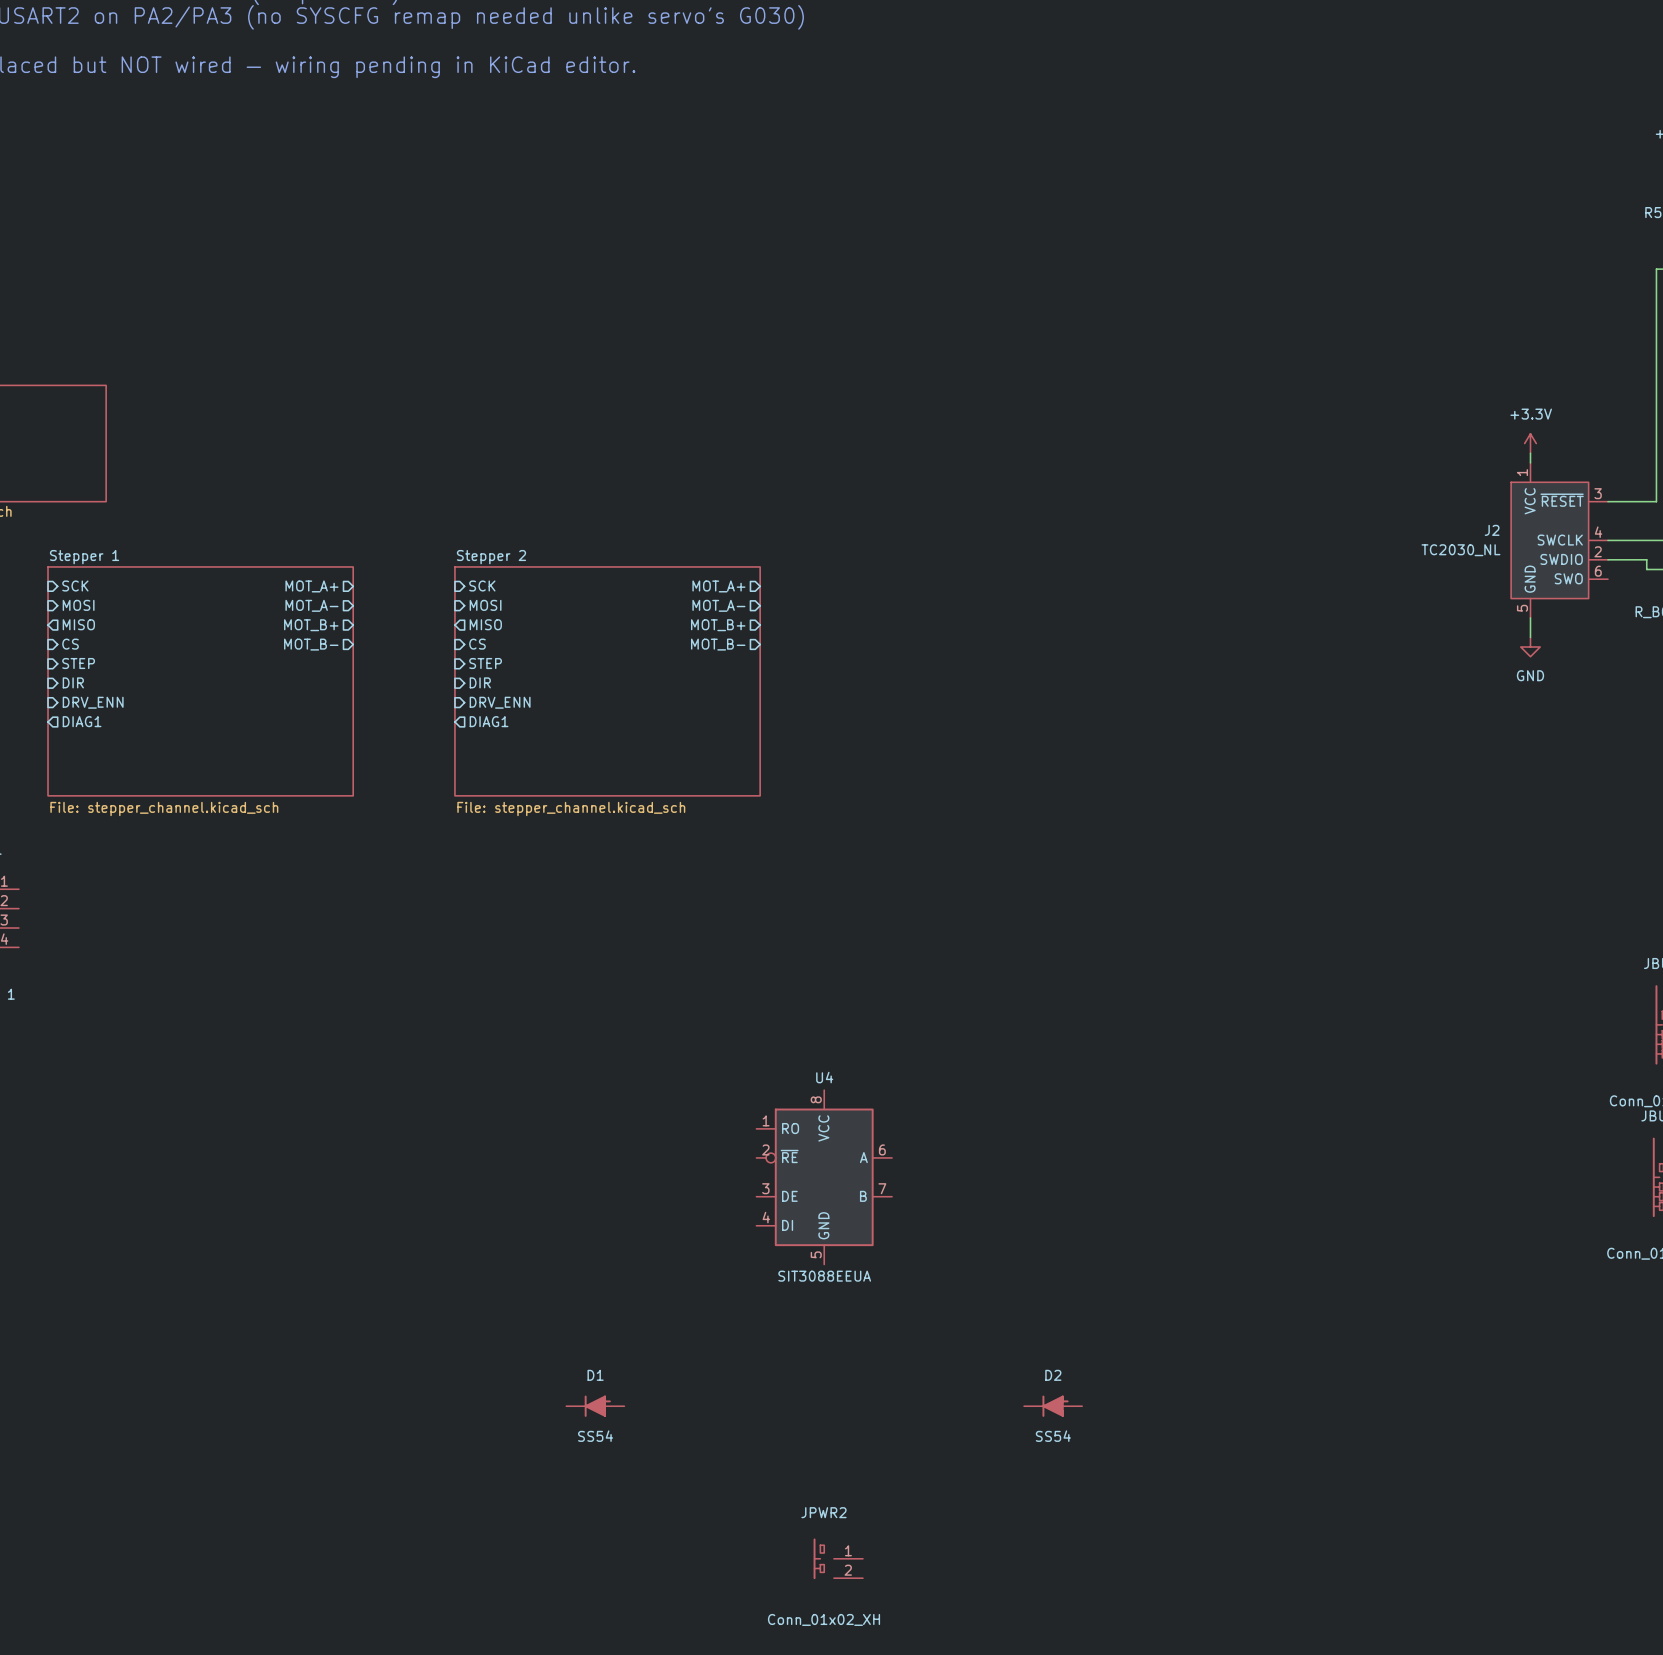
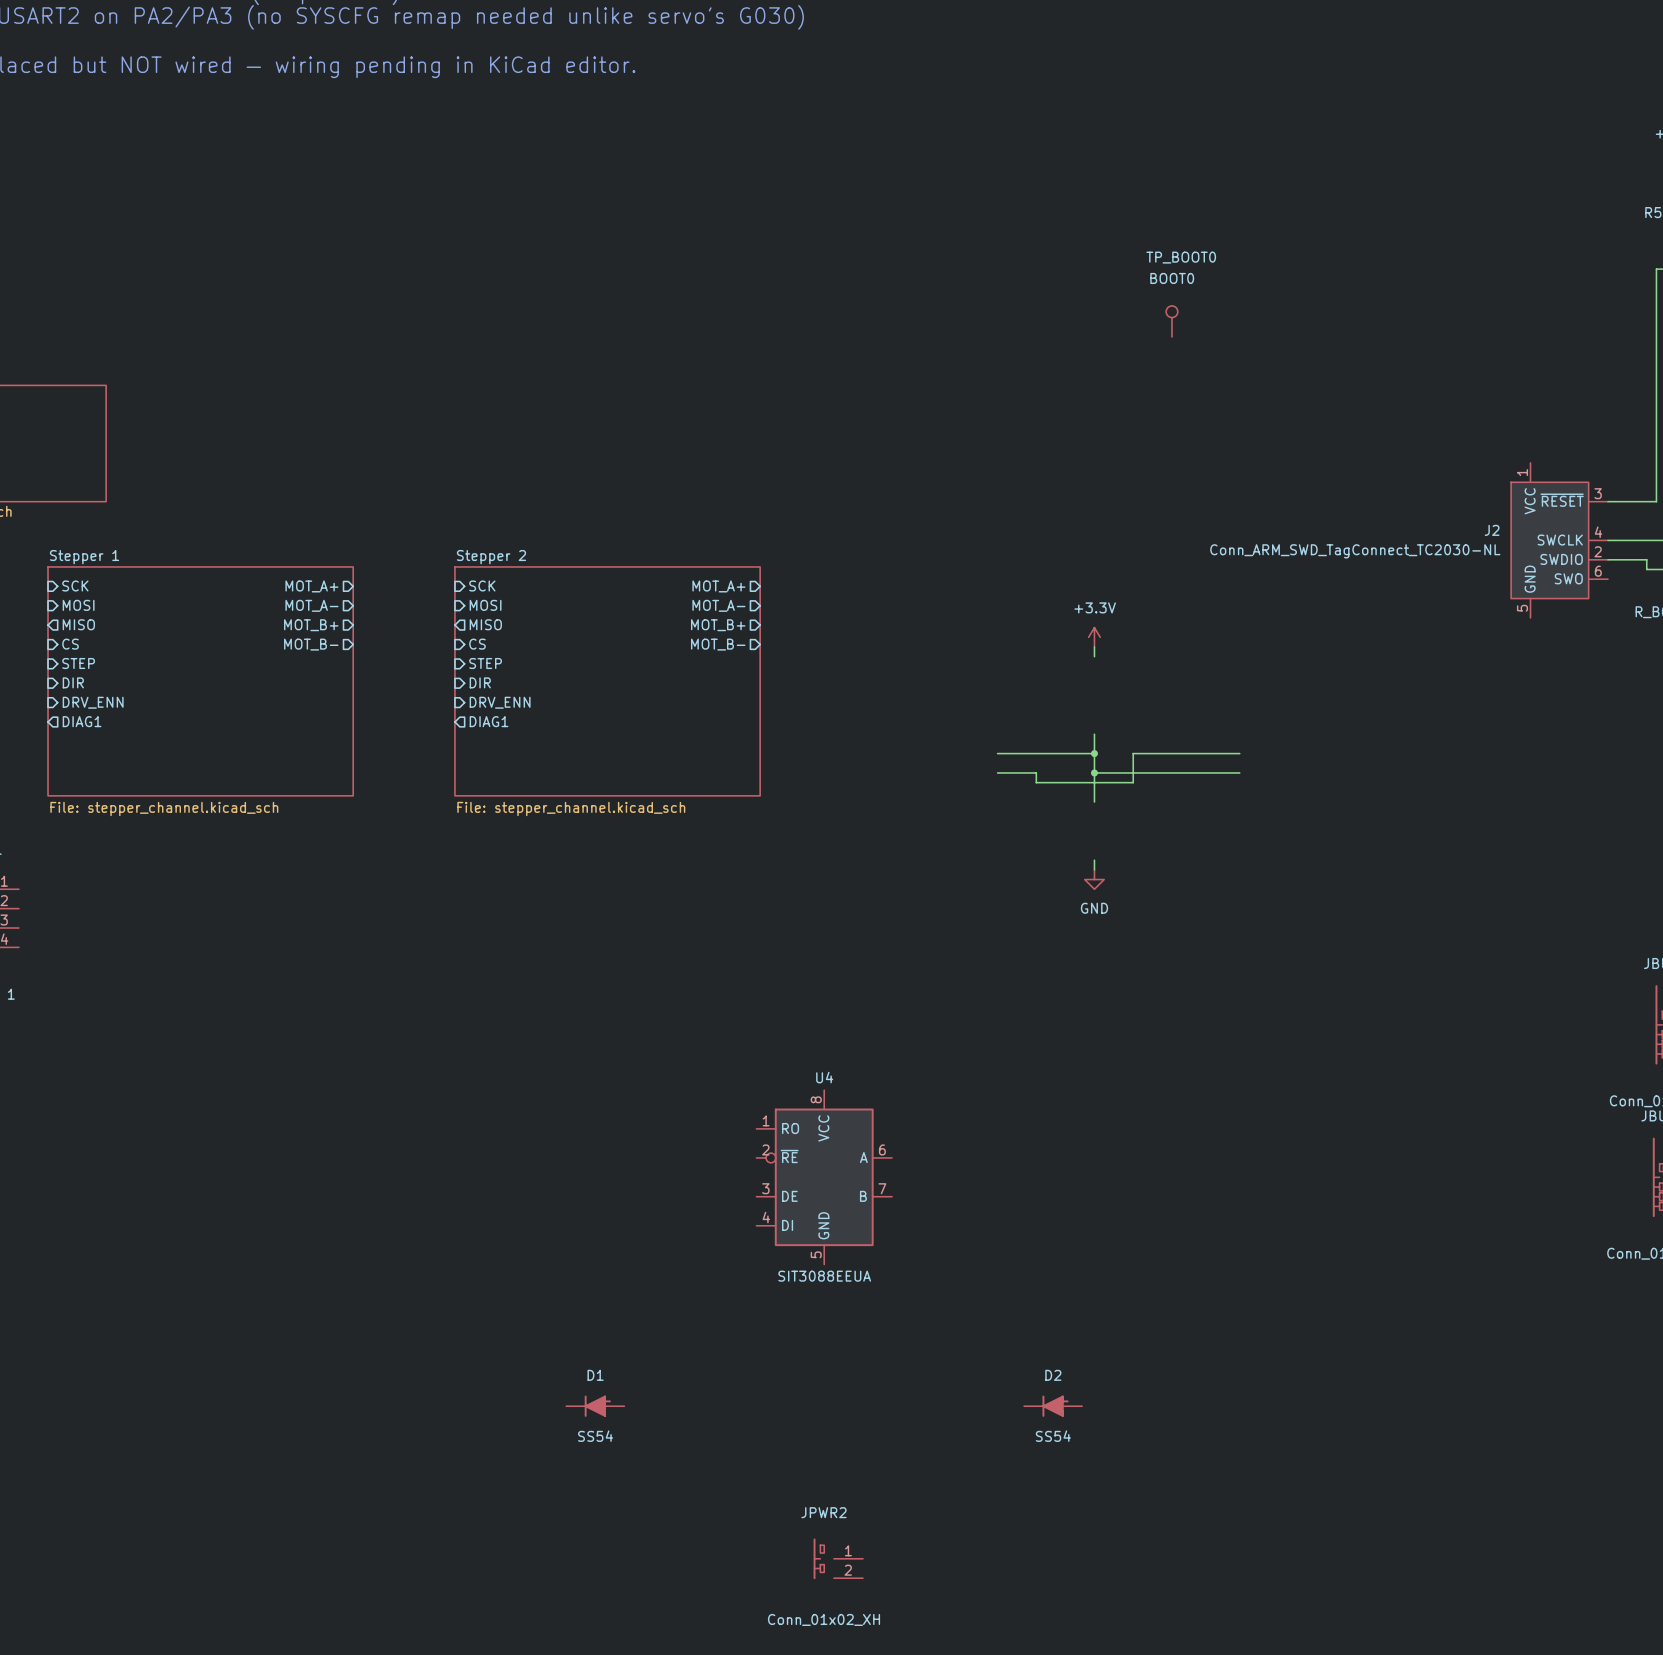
TP_BOOT0: none -> BOOT0 (1171, 321)
power symbol: +3.3V (1530, 443) -> none
wire: (1530, 453) (1530, 462) -> none
J2 value: TC2030_NL (1460, 550) -> Conn_ARM_SWD_TagConnect_TC2030-NL (1355, 551)
wire: (1530, 617) (1530, 637) -> none
power symbol: none -> +3.3V (1094, 637)
wire: none -> (1094, 647) (1094, 656)
power symbol: GND (1530, 647) -> none
wire: none -> (1094, 734) (1094, 802)
wire: none -> (997, 753) (1094, 753)
junction: none -> (1094, 753)
wire: none -> (1239, 753) (1133, 753) (1133, 782) (1036, 782) (1036, 772) (997, 772)
wire: none -> (1094, 772) (1239, 772)
junction: none -> (1094, 772)
wire: none -> (1094, 860) (1094, 869)
power symbol: none -> GND (1094, 879)

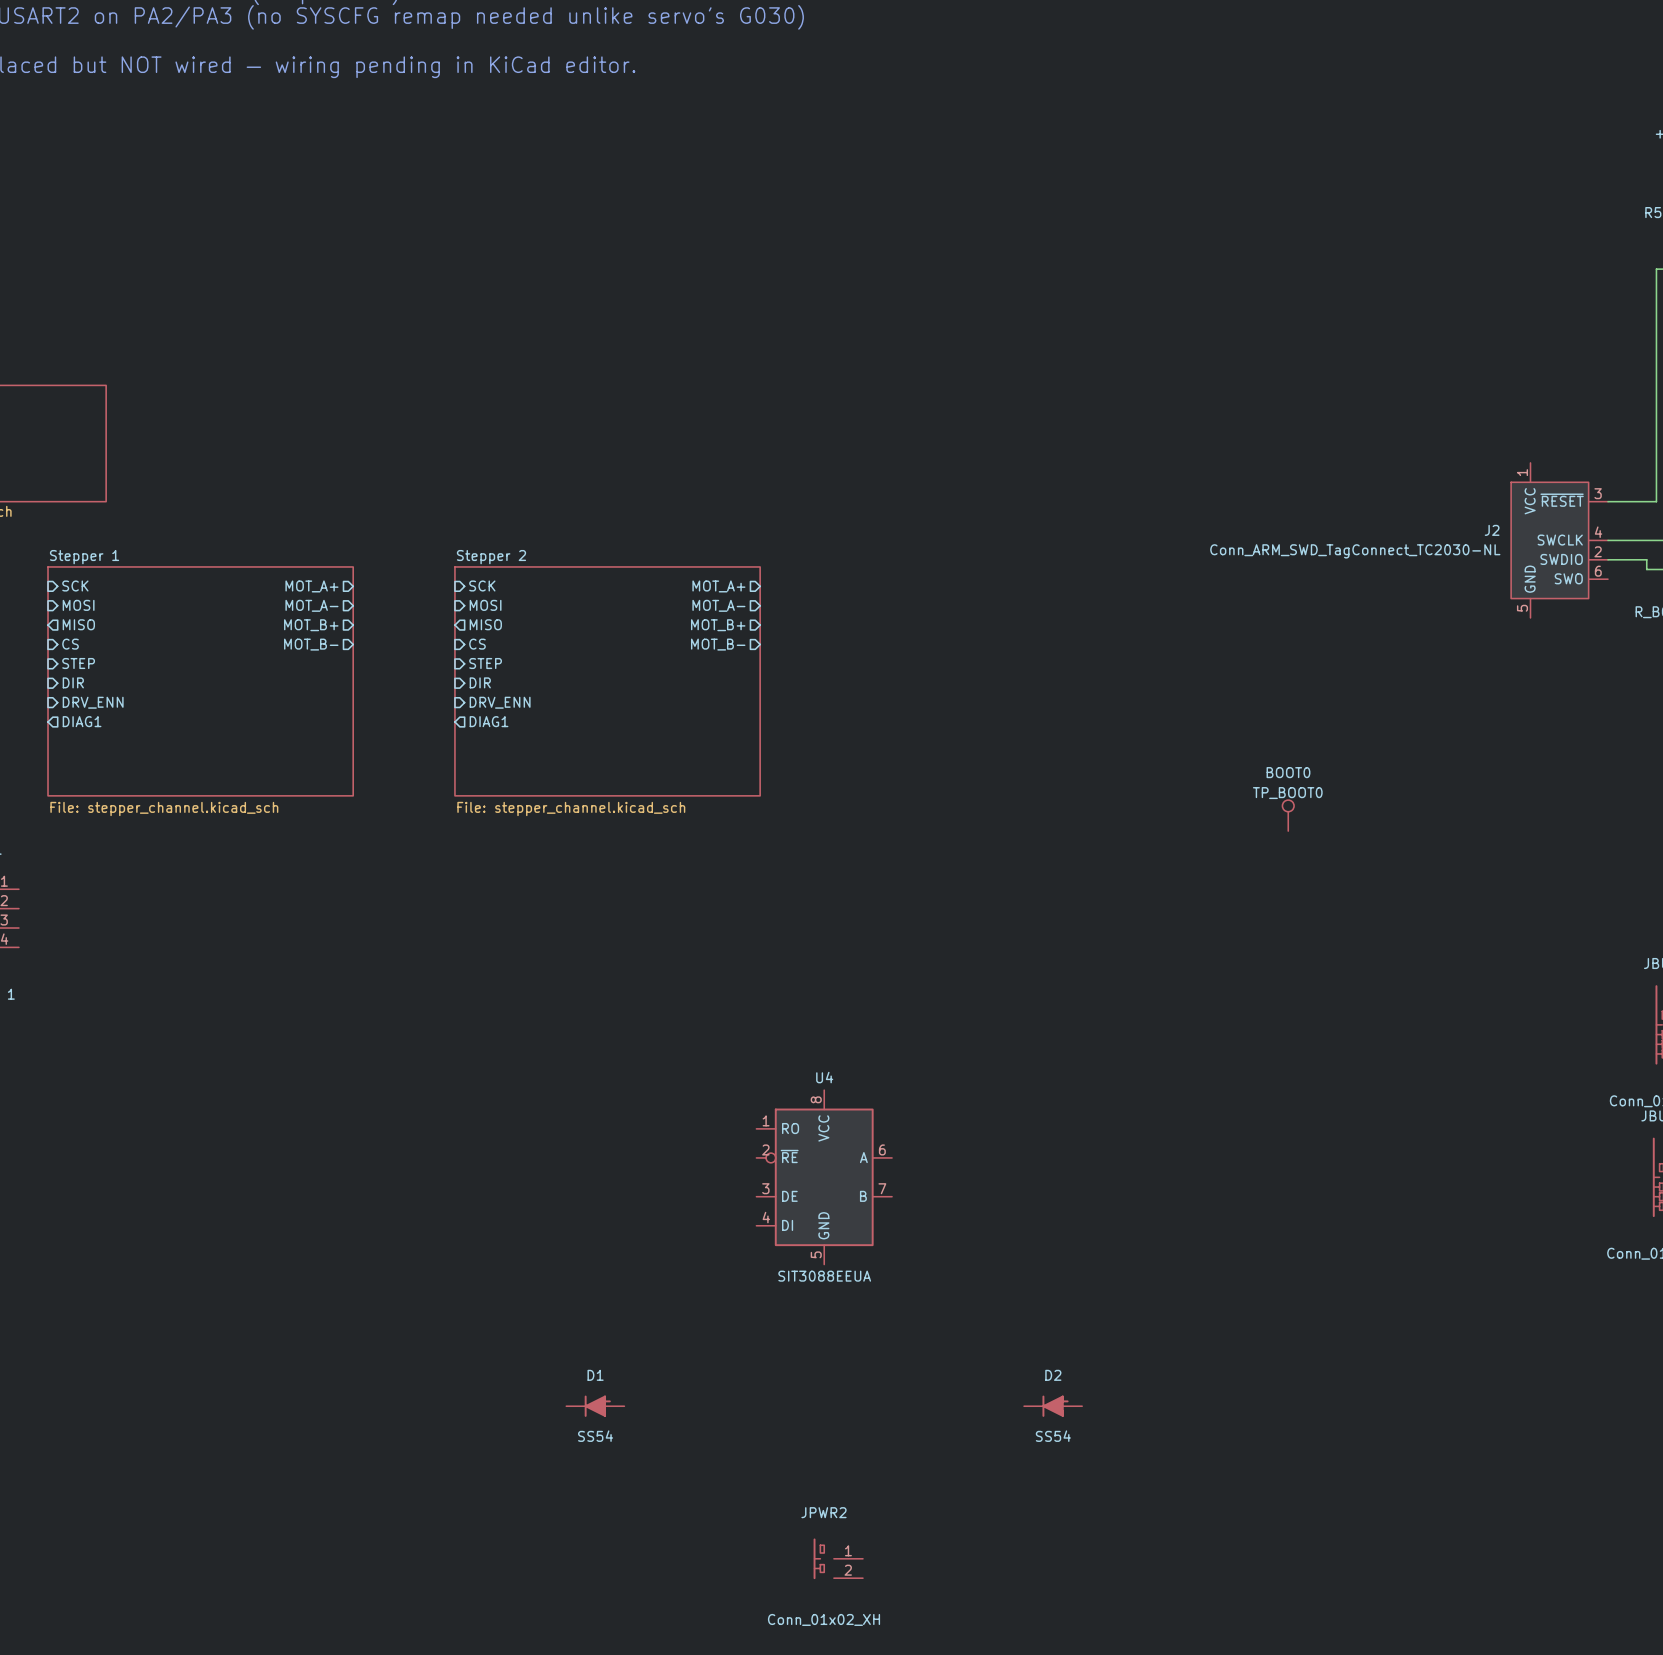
TP_BOOT0 name position: TP_BOOT0 (1181, 257) -> TP_BOOT0 (1287, 793)
TP_BOOT0 position: (1171, 321) -> (1288, 815)
power symbol: +3.3V (1094, 637) -> none
wire: (1094, 647) (1094, 656) -> none
wire: (1094, 734) (1094, 802) -> none
wire: (997, 753) (1094, 753) -> none
junction: (1094, 753) -> none
wire: (1239, 753) (1133, 753) (1133, 782) (1036, 782) (1036, 772) (997, 772) -> none
wire: (1094, 772) (1239, 772) -> none
junction: (1094, 772) -> none
wire: (1094, 860) (1094, 869) -> none
power symbol: GND (1094, 879) -> none

